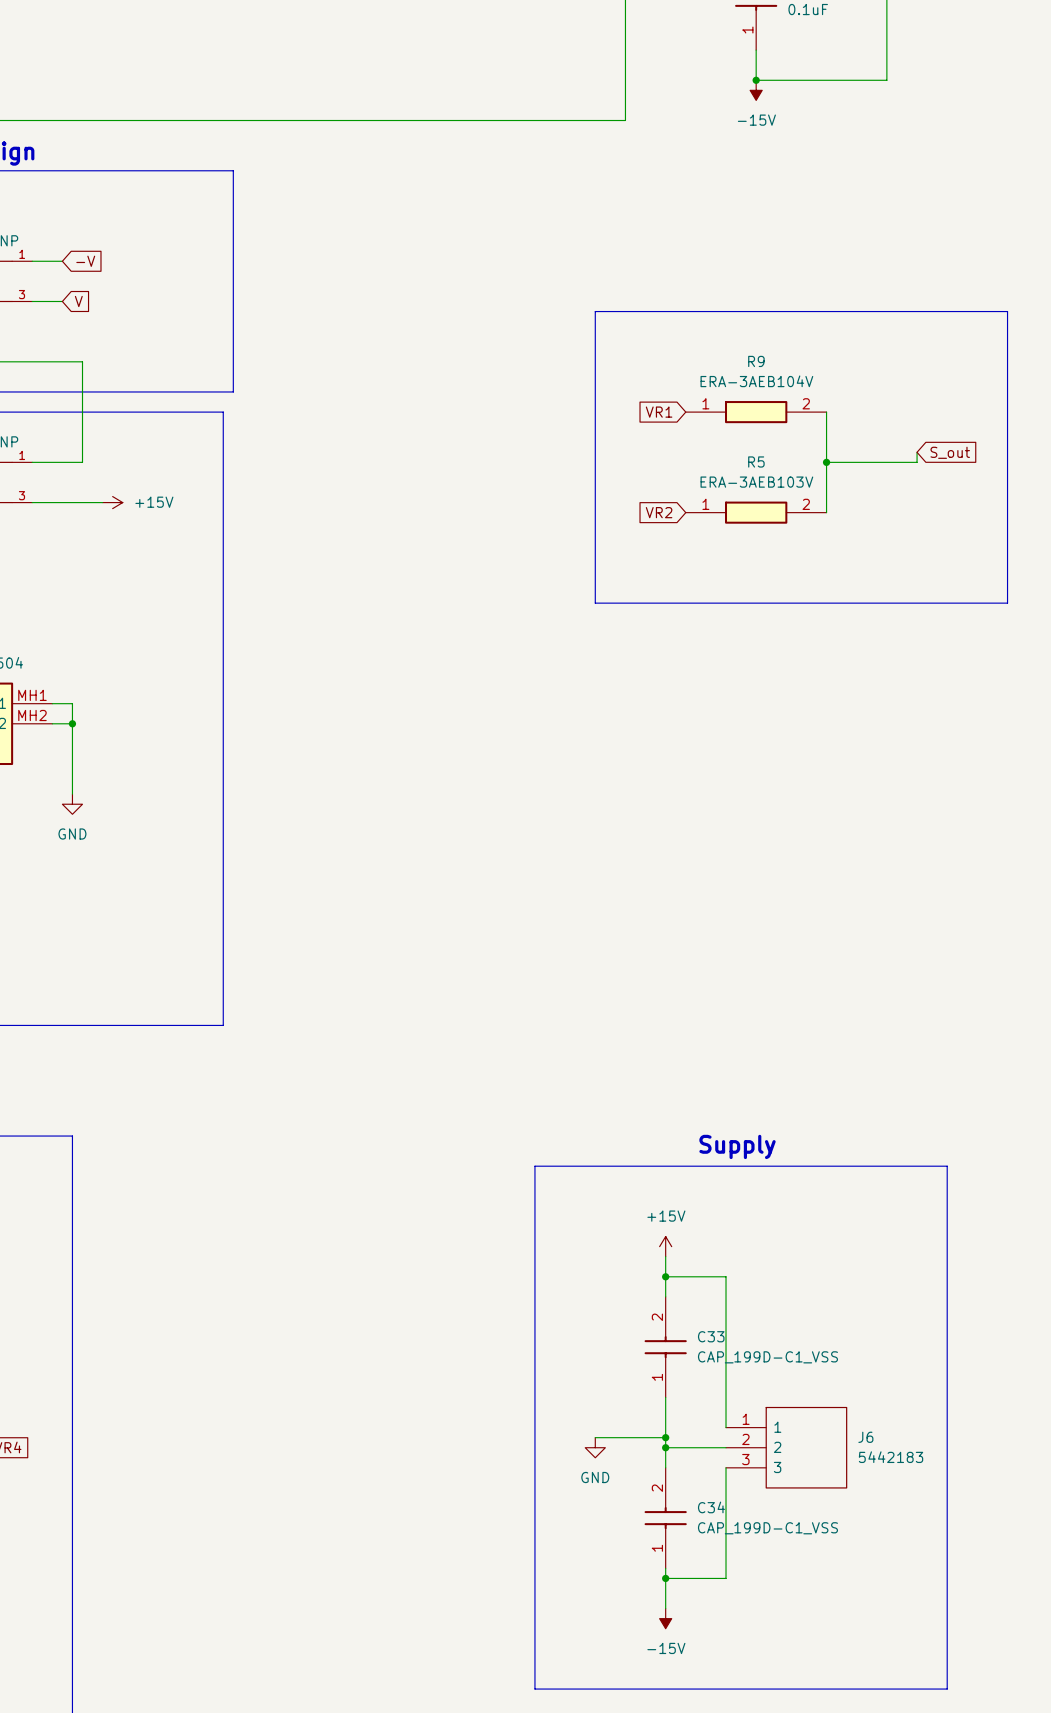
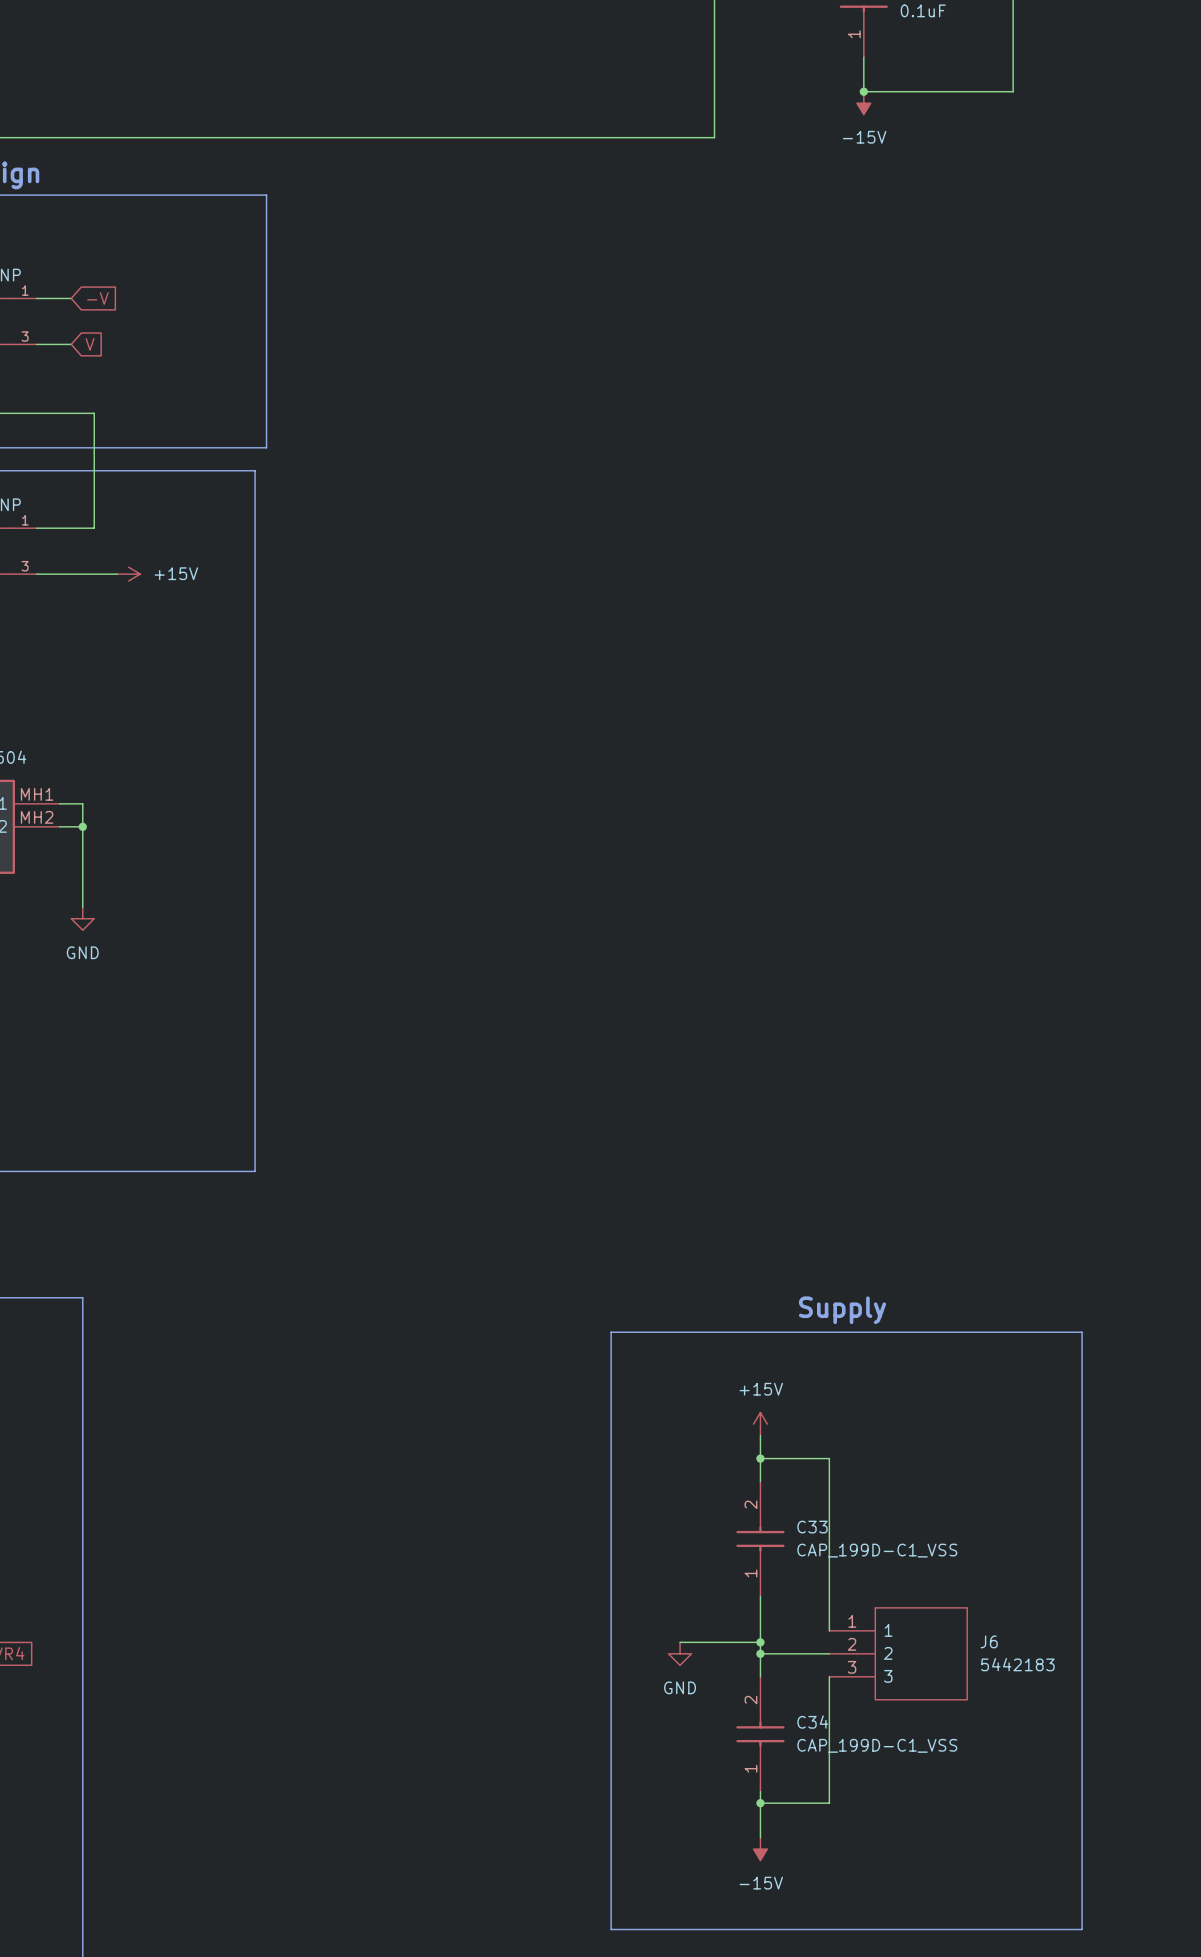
line: (595, 311) (1007, 311) (1007, 603) (595, 603) (595, 311) -> none
global label: VR1 (659, 412) -> none
R9: ERA-3AEB104V (756, 412) -> none
wire: (826, 412) (826, 512) -> none
wire: (917, 452) (917, 462) (826, 462) -> none
global label: S_out (950, 452) -> none
junction: (826, 462) -> none
global label: VR2 (659, 512) -> none
R5: ERA-3AEB103V (756, 512) -> none

